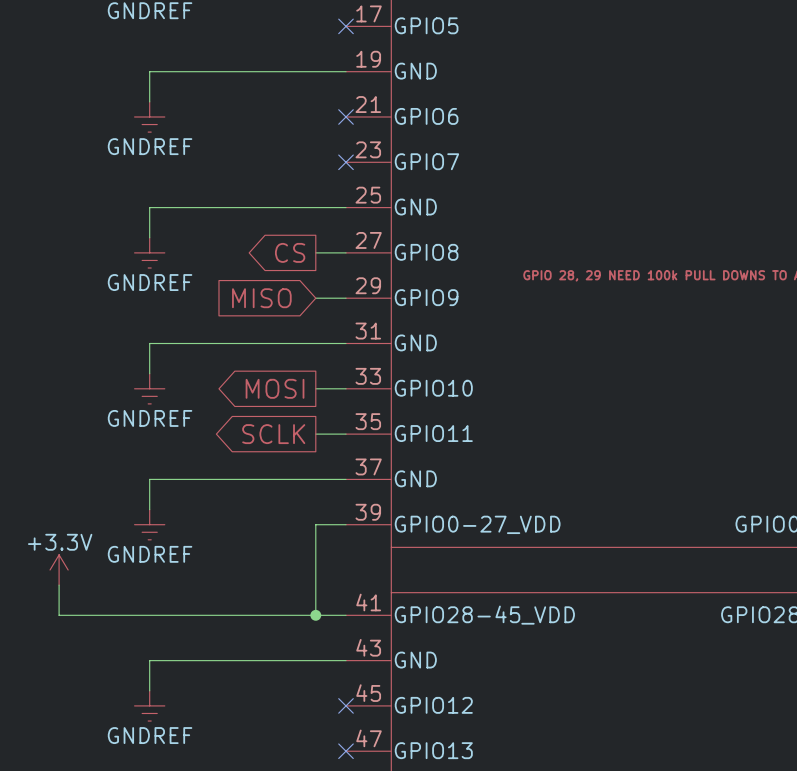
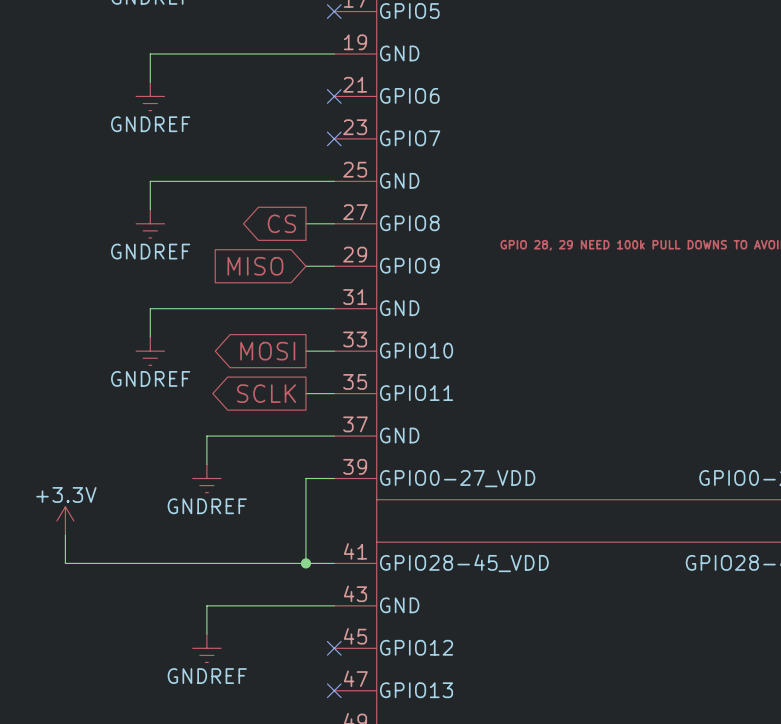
wire: (210, 479) (149, 479) (149, 509) -> (206, 436) (206, 464)
power symbol position: GNDREF (149, 524) -> GNDREF (206, 478)
wire: (210, 660) (149, 660) (149, 690) -> (206, 605) (206, 634)
power symbol position: GNDREF (149, 705) -> GNDREF (206, 648)

